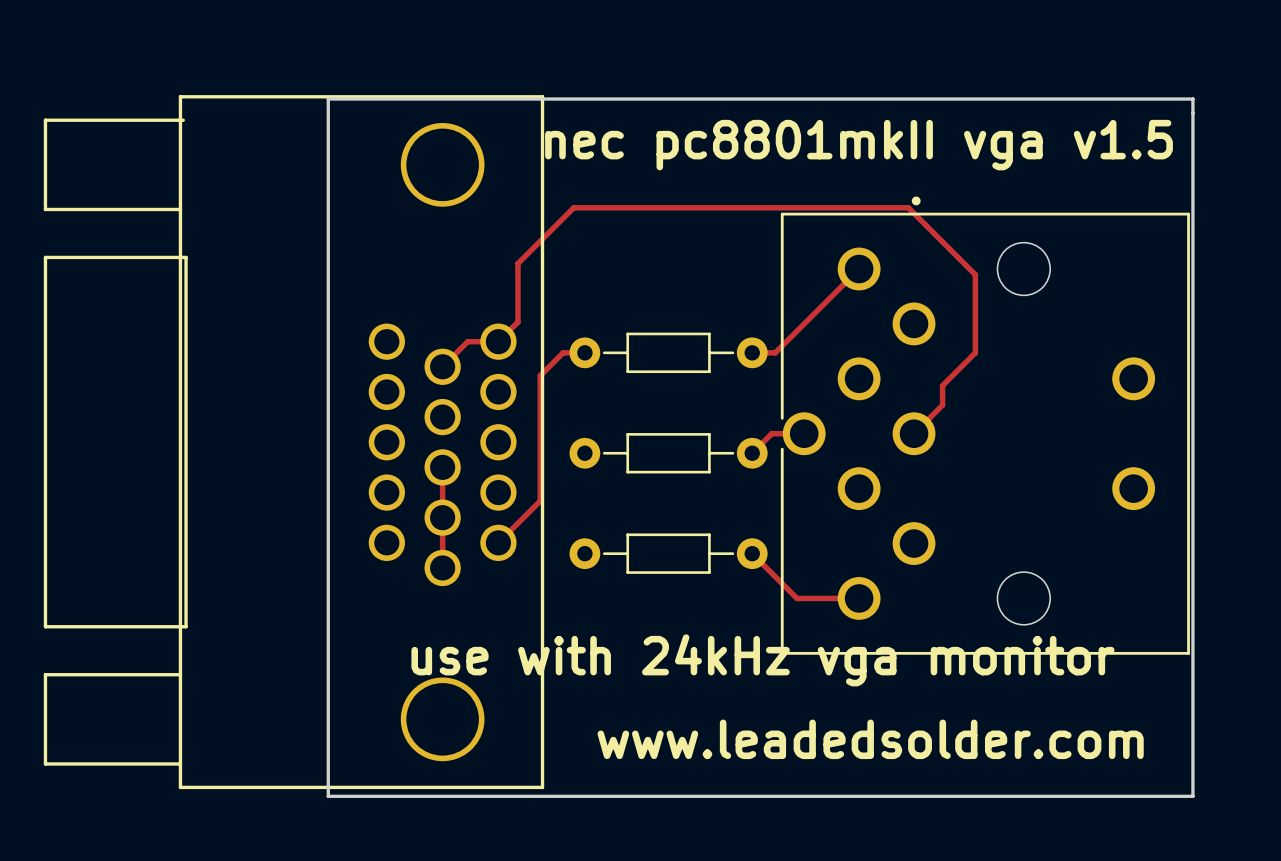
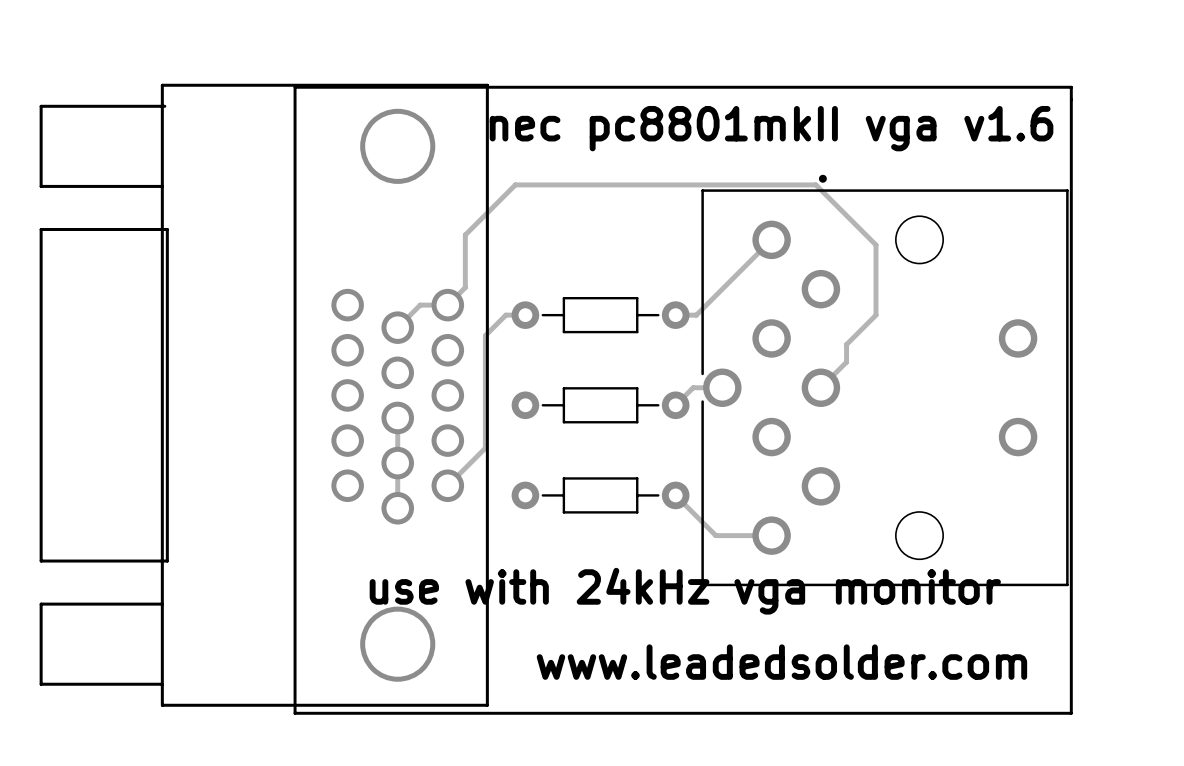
text: nec pc8801mkII vga v1.5 (859, 145) -> nec pc8801mkII vga v1.6 (771, 128)

